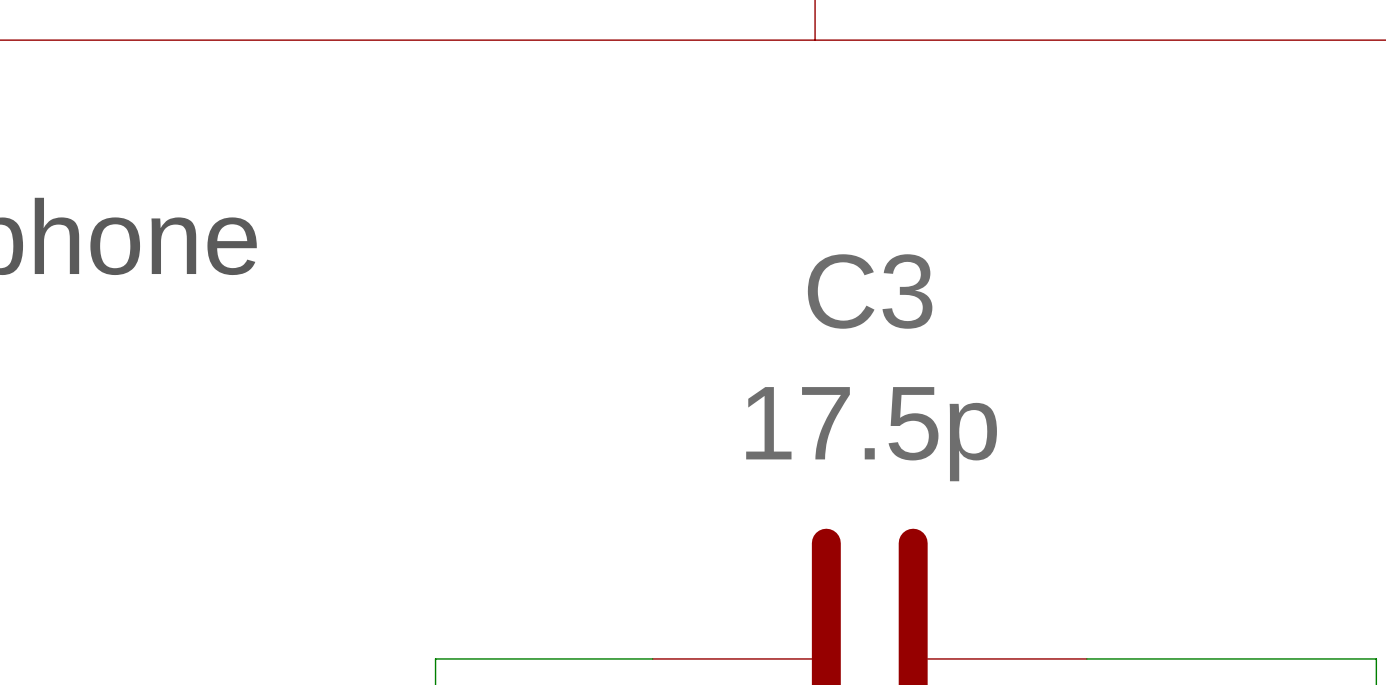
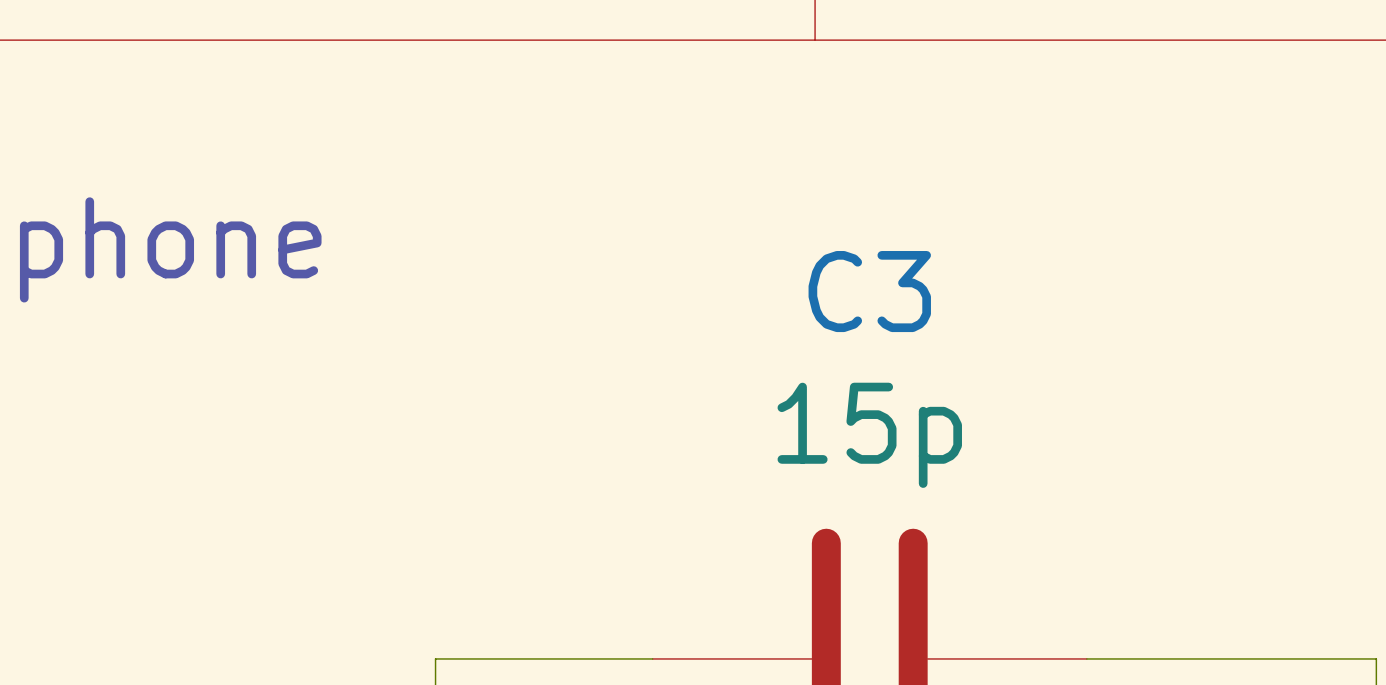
C3 value: 17.5p (871, 434) -> 15p (869, 435)

